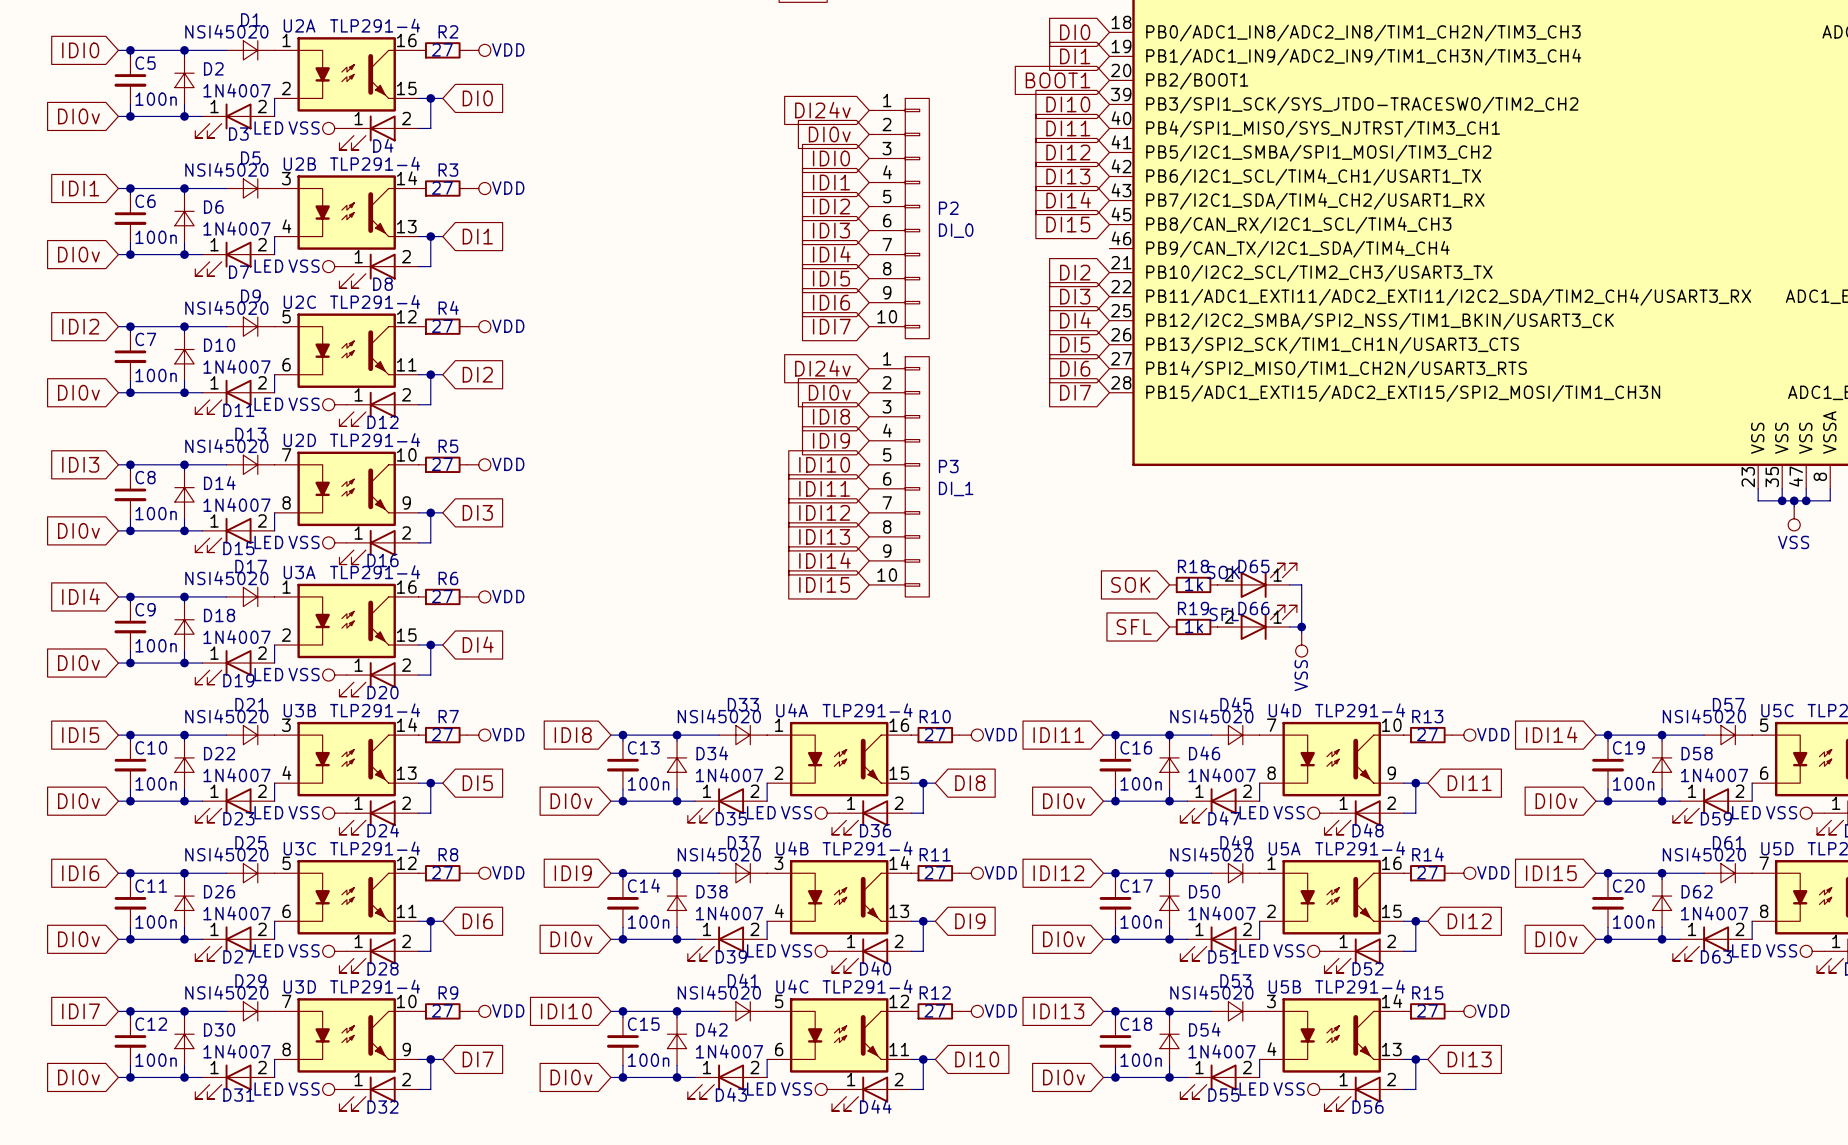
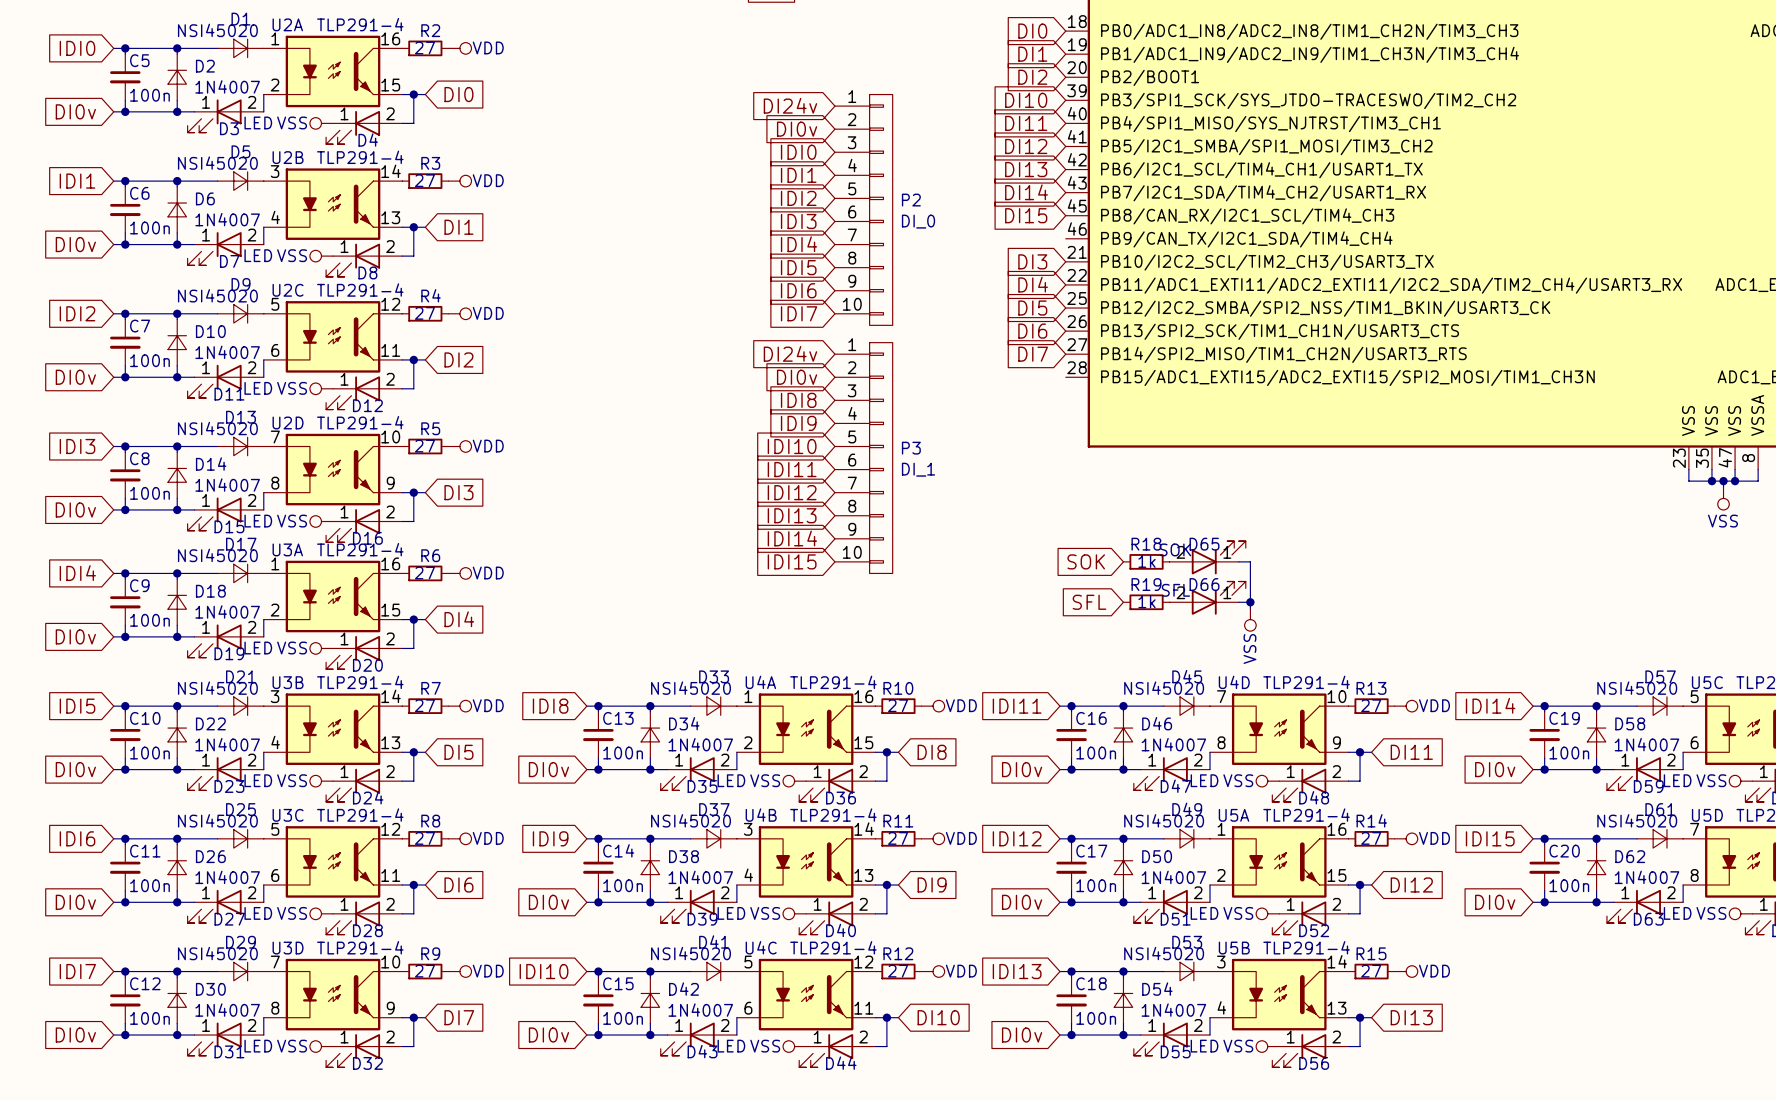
global label: BOOT1 (1057, 80) -> DI2 (1032, 77)
global label: DI2 (1075, 272) -> DI3 (1032, 261)
global label: DI3 (1075, 296) -> DI4 (1033, 284)
global label: DI4 (1075, 320) -> DI5 (1032, 308)
global label: DI5 (1075, 344) -> DI6 (1032, 331)
global label: DI6 (1075, 368) -> DI7 (1033, 354)
global label: DI7 (1075, 392) -> none

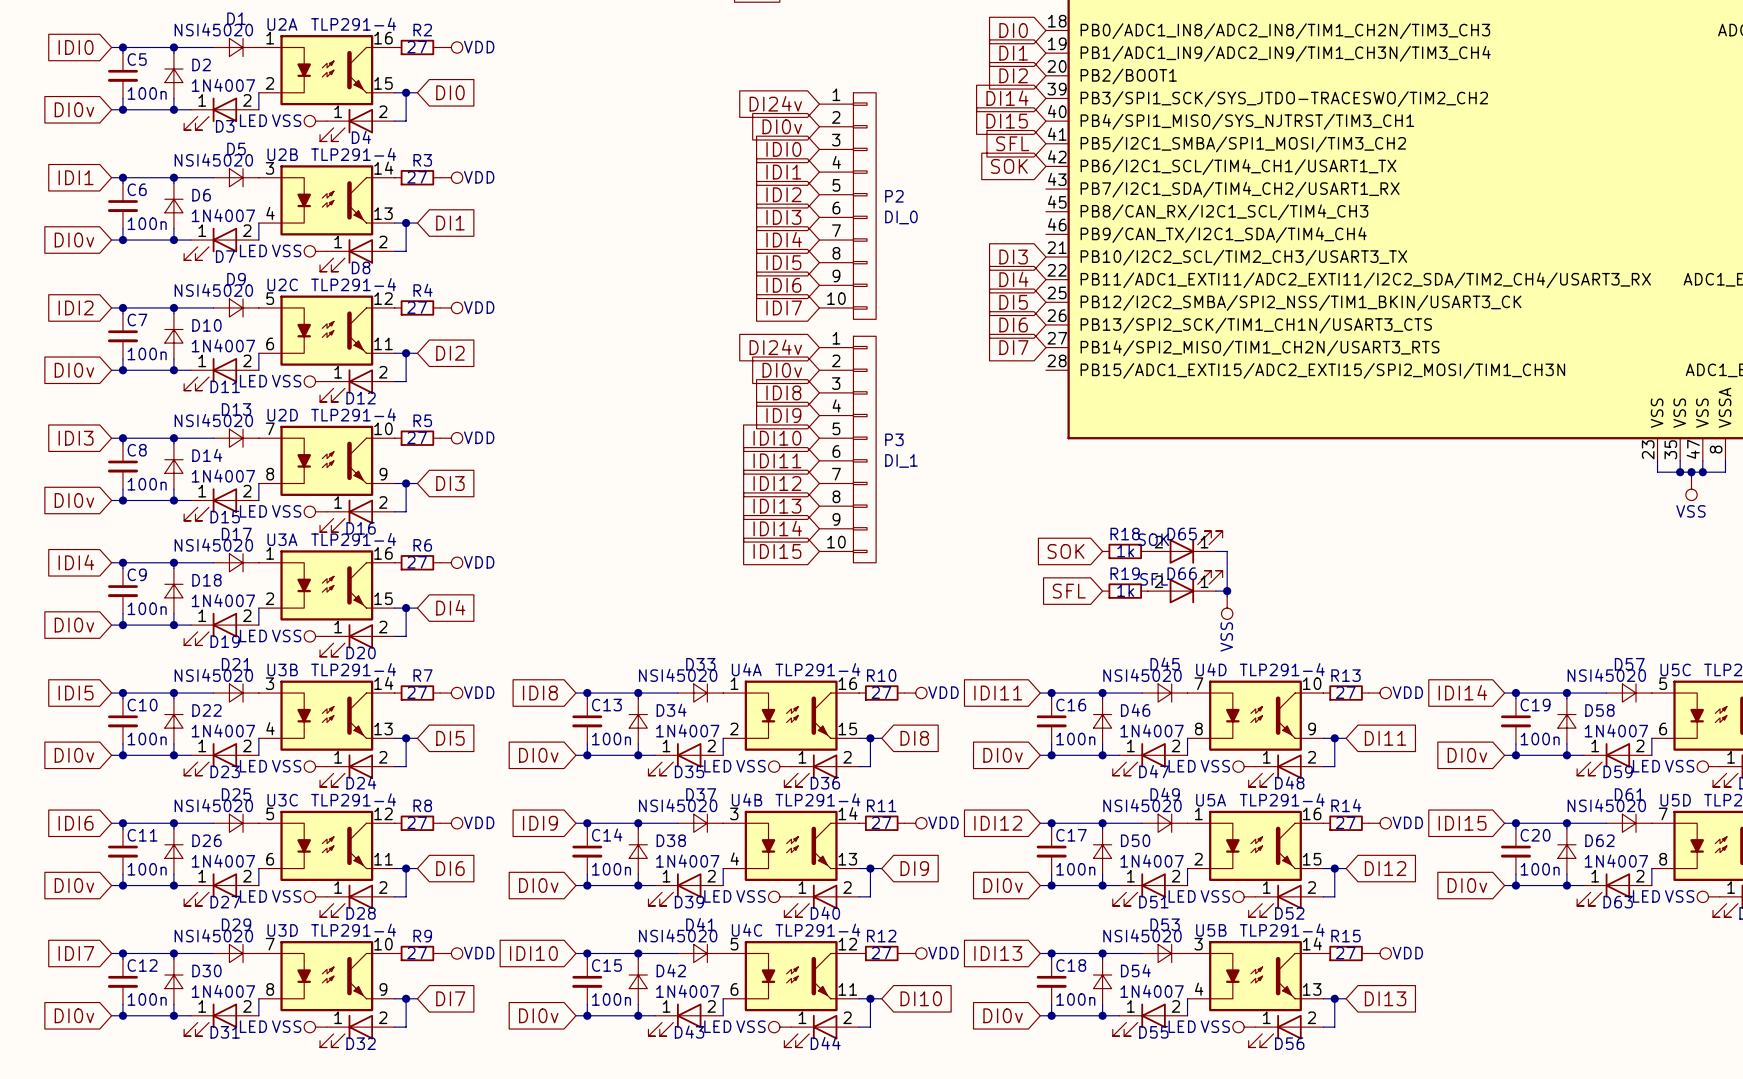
global label: DI10 (1026, 100) -> DI14 (1007, 98)
global label: DI11 (1026, 123) -> DI15 (1007, 121)
global label: DI12 (1026, 146) -> SFL (1012, 143)
global label: DI13 (1026, 169) -> SOK (1009, 166)
global label: DI14 (1026, 192) -> none
global label: DI15 (1026, 215) -> none

